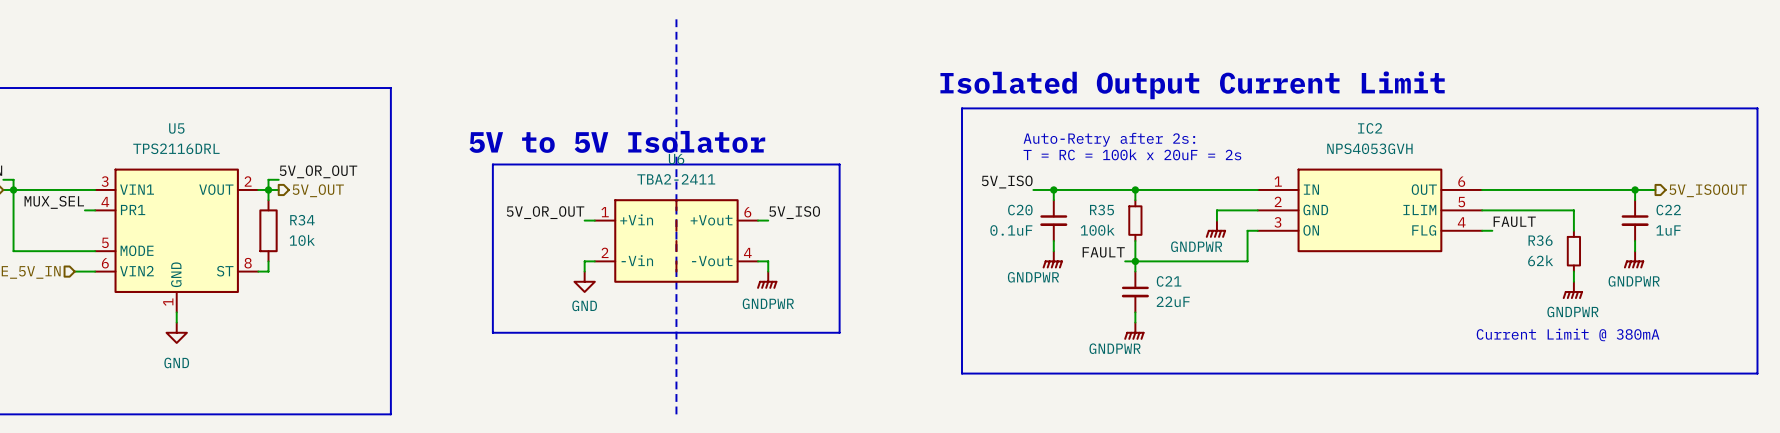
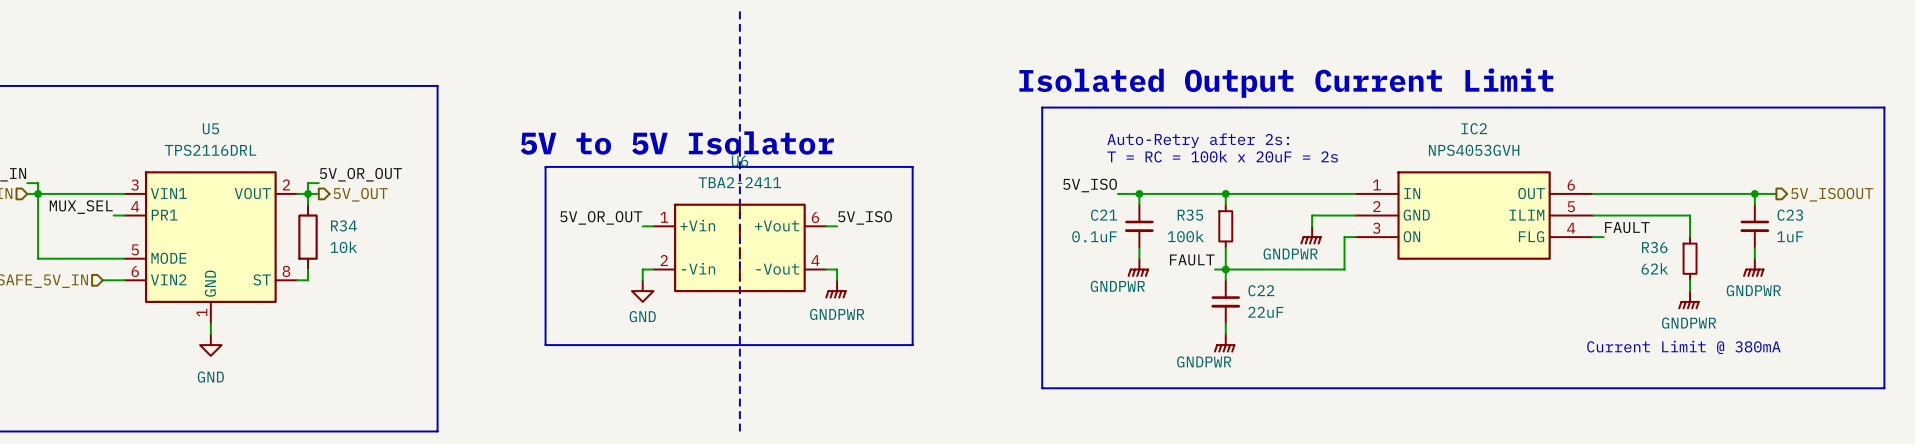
C20 name: C20 (1020, 210) -> C21 (1104, 215)
C22 name: C22 (1668, 210) -> C23 (1790, 215)
C21 name: C21 (1169, 281) -> C22 (1261, 290)

